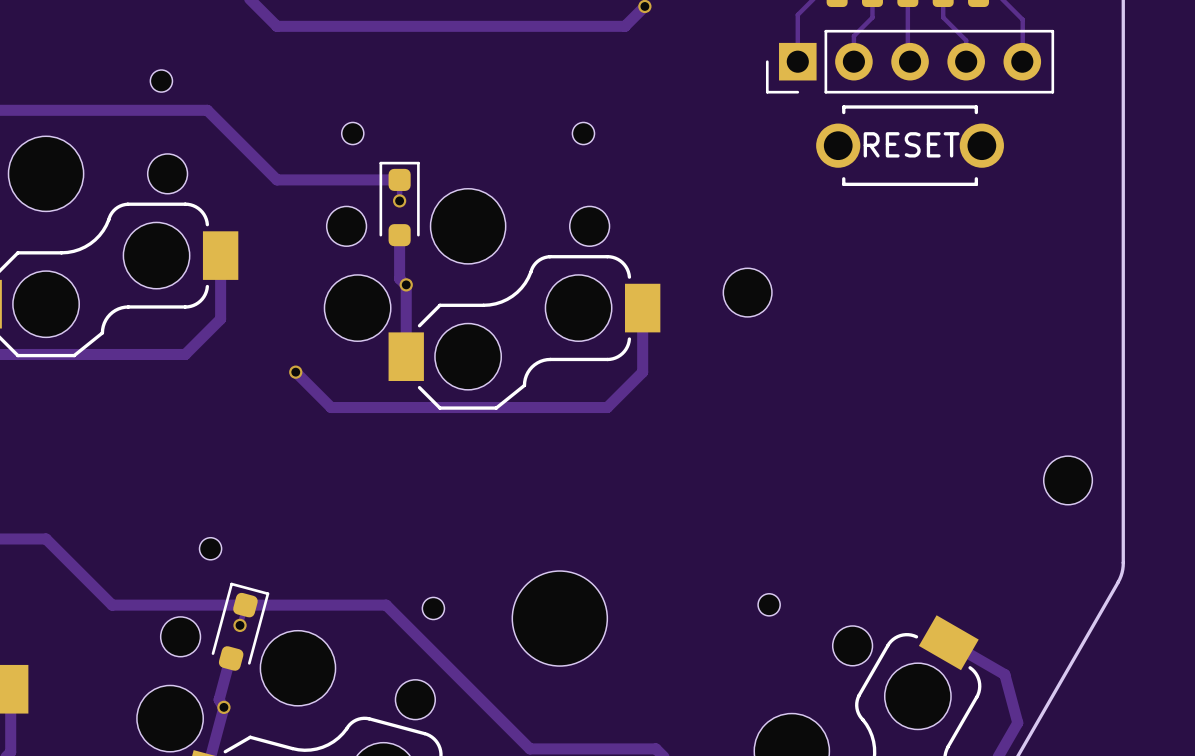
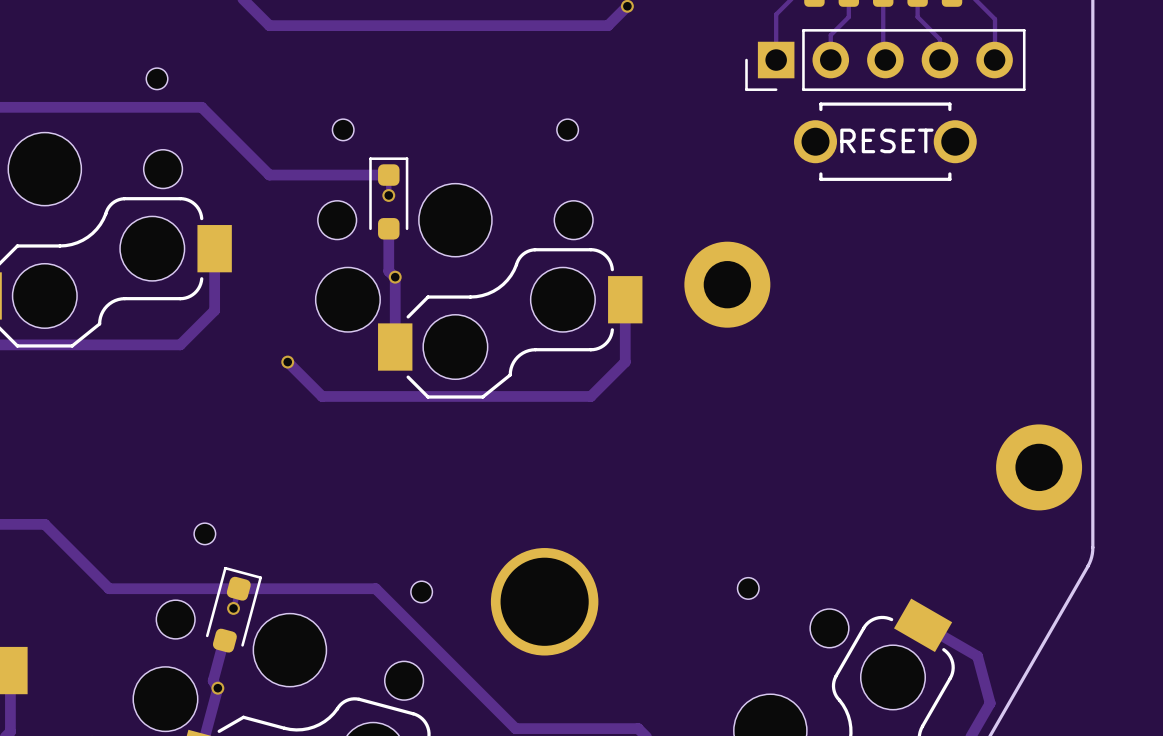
part footprint: [723, 268, 772, 317] -> [684, 241, 771, 328]
part footprint: [1043, 456, 1093, 505] -> [996, 424, 1083, 511]
part footprint: [512, 571, 608, 667] -> [490, 548, 599, 656]

